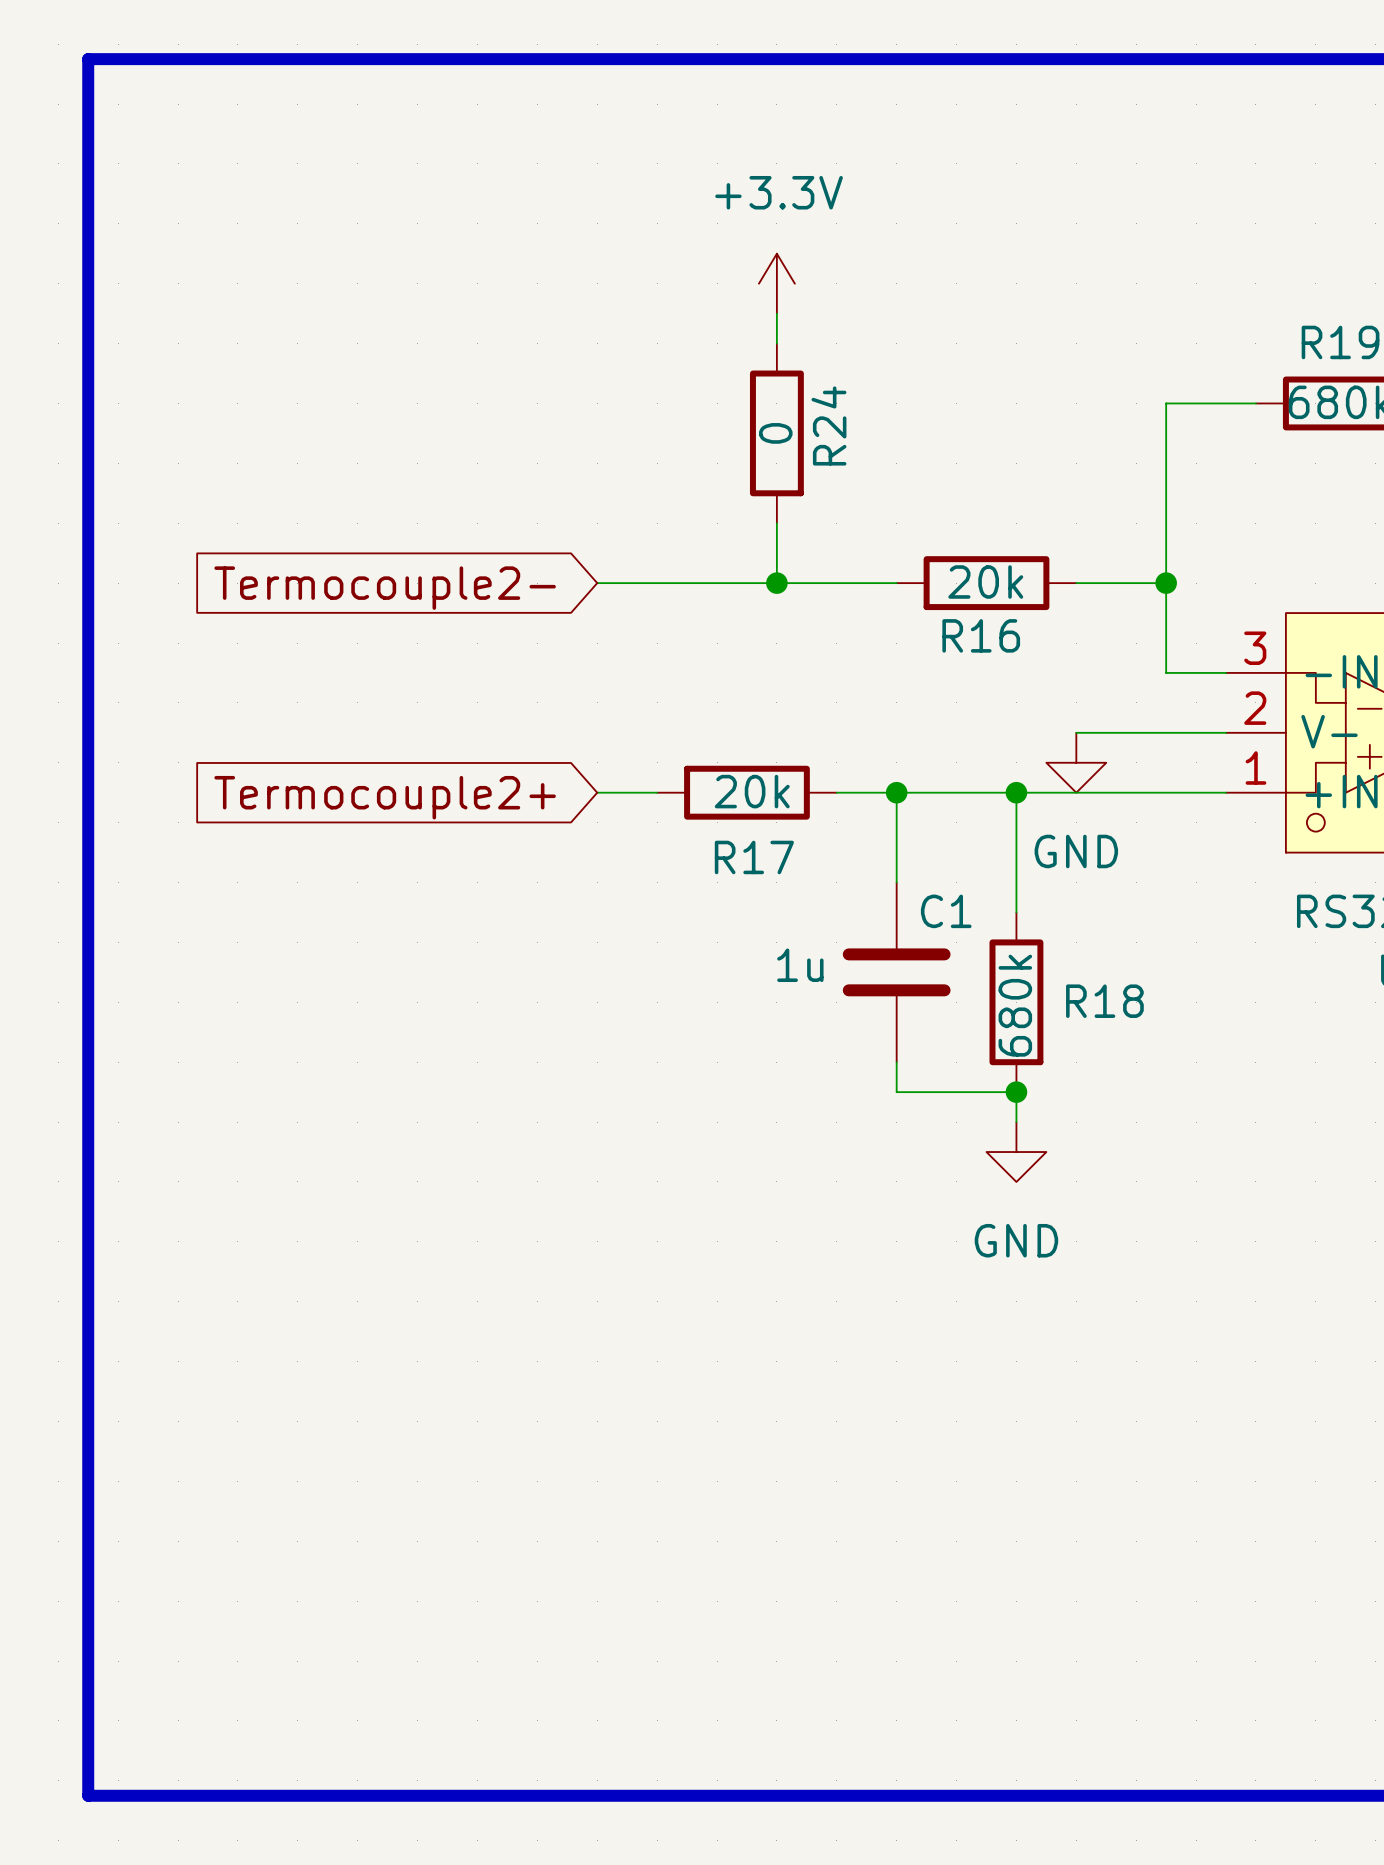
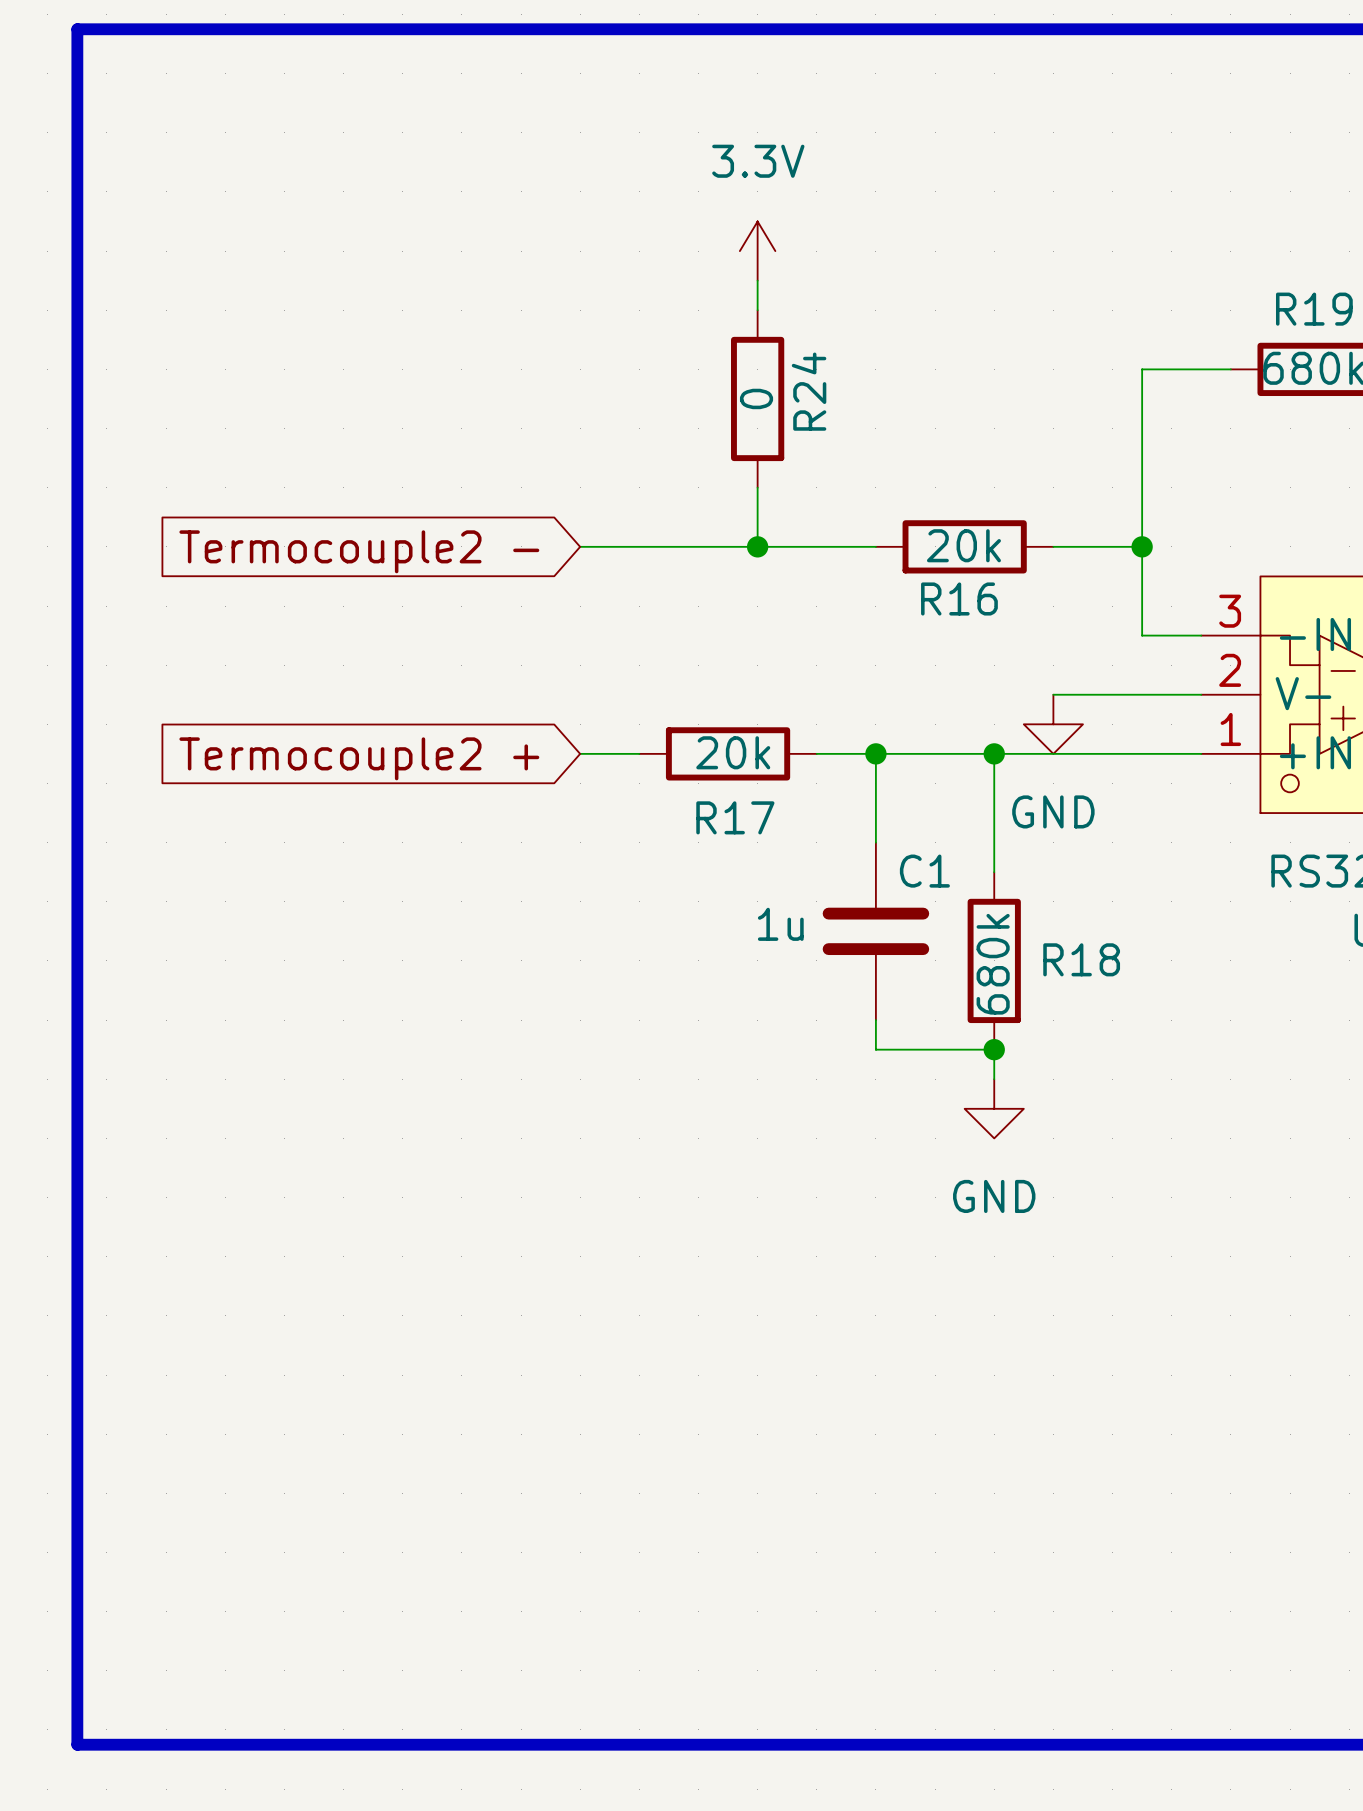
power symbol: +3.3V (776, 283) -> 3.3V (757, 251)
global label: Termocouple2- (385, 588) -> Termocouple2 - (359, 551)
global label: Termocouple2+ (385, 797) -> Termocouple2 + (359, 758)

